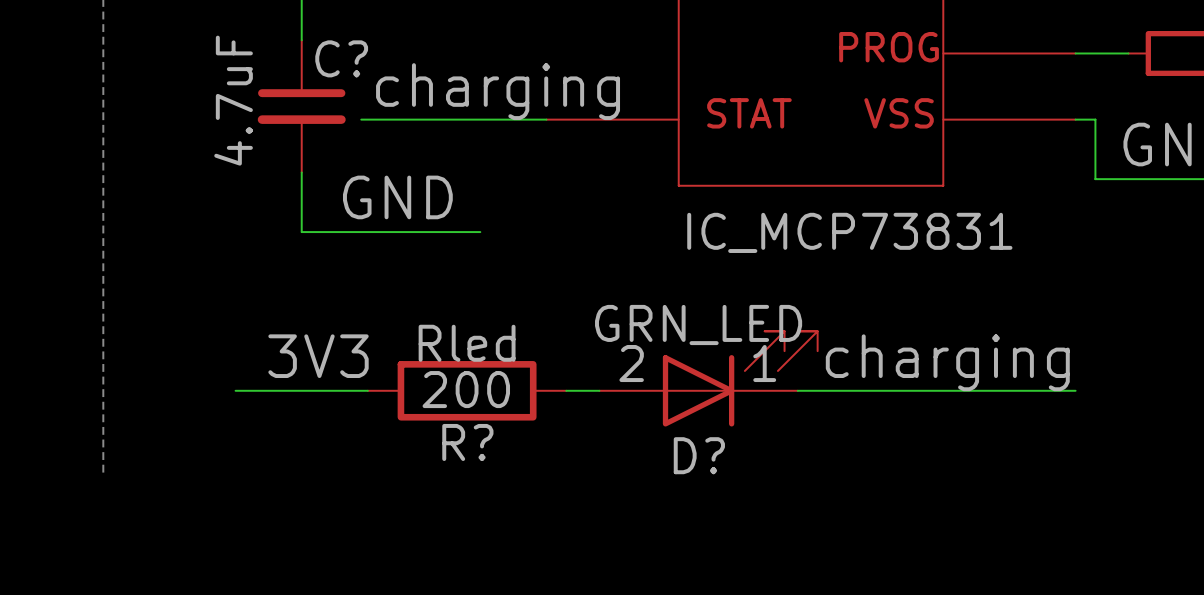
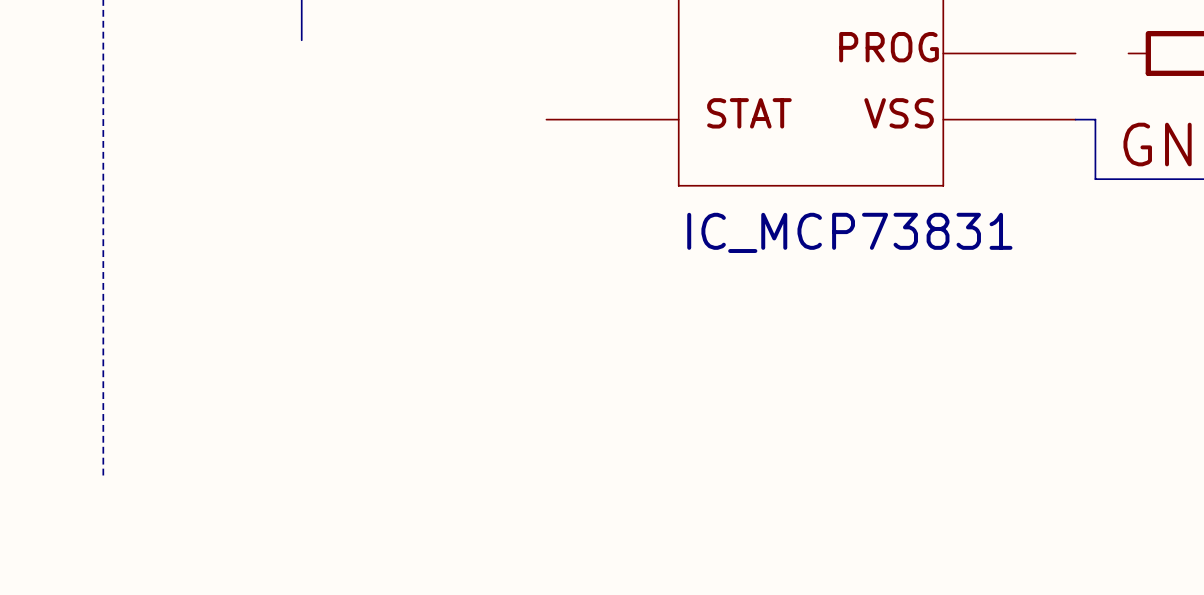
wire: (1075, 53) (1128, 53) -> none
label: charging (498, 91) -> none
C?: 4.7uF (301, 106) -> none
wire: (361, 119) (546, 119) -> none
wire: (301, 172) (301, 232) (480, 232) -> none
label: GND (397, 197) -> none
label: 3V3 (318, 356) -> none
label: charging (947, 362) -> none
D?: GRN_LED (708, 378) -> none
wire: (235, 390) (367, 390) -> none
R?: 200 (467, 390) -> none
wire: (566, 390) (599, 390) -> none
wire: (797, 390) (1075, 390) -> none

